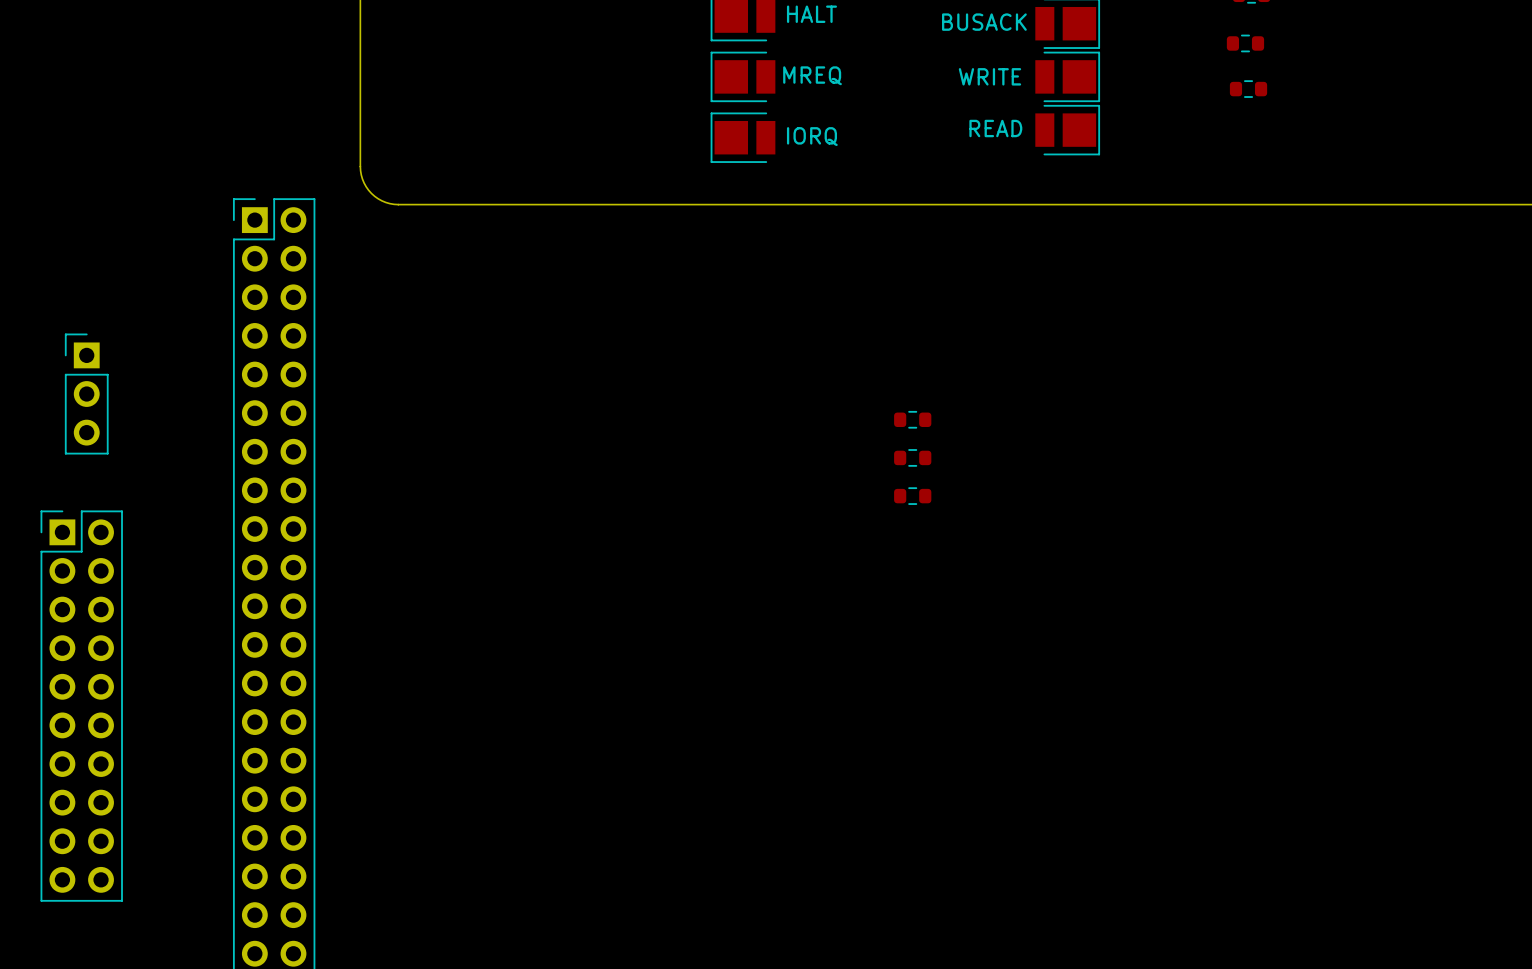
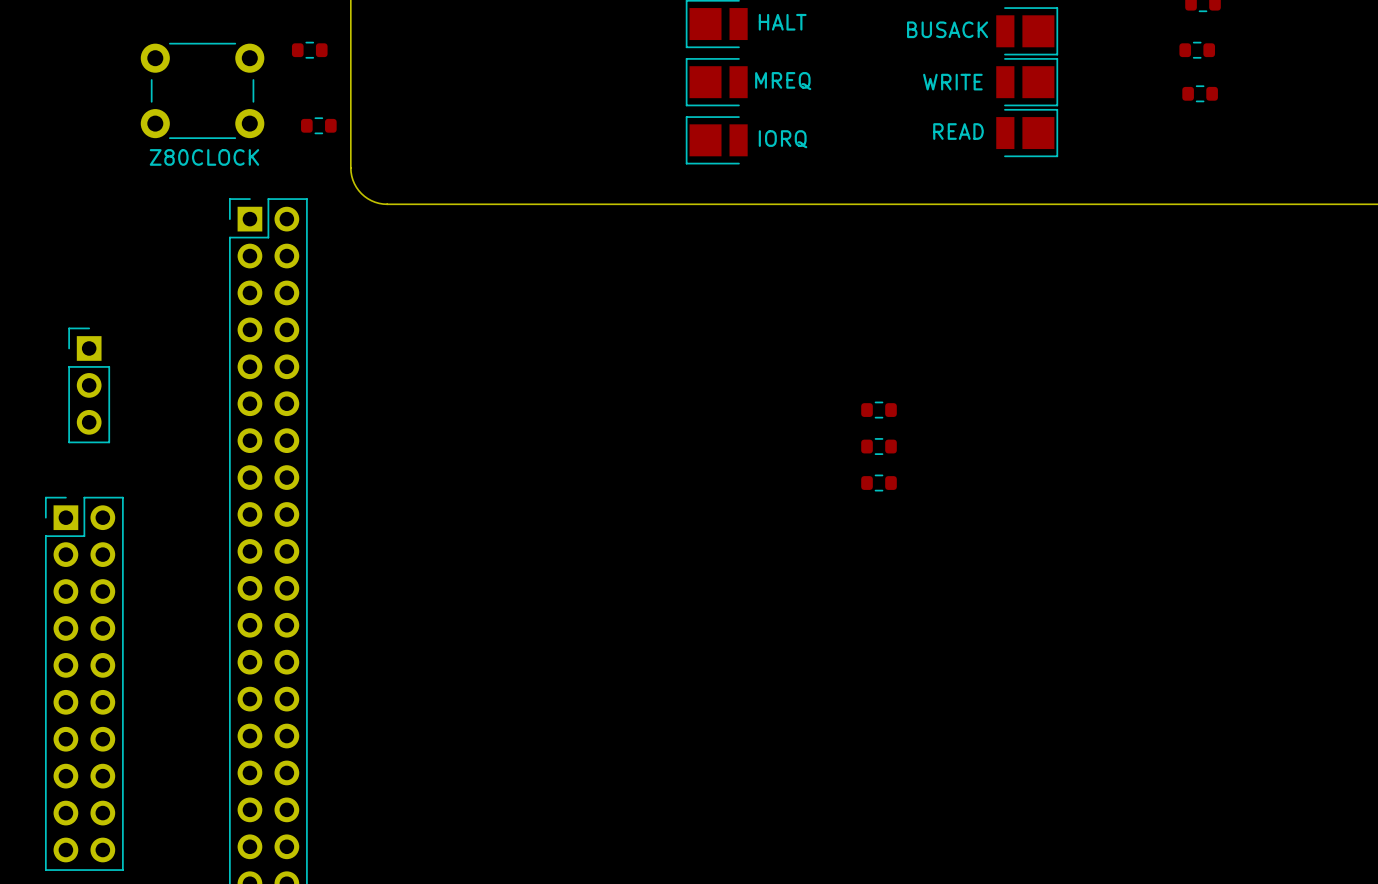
part: none -> (309, 50)
part: none -> (202, 90)
part: none -> (318, 125)
text: none -> Z80CLOCK (204, 157)

